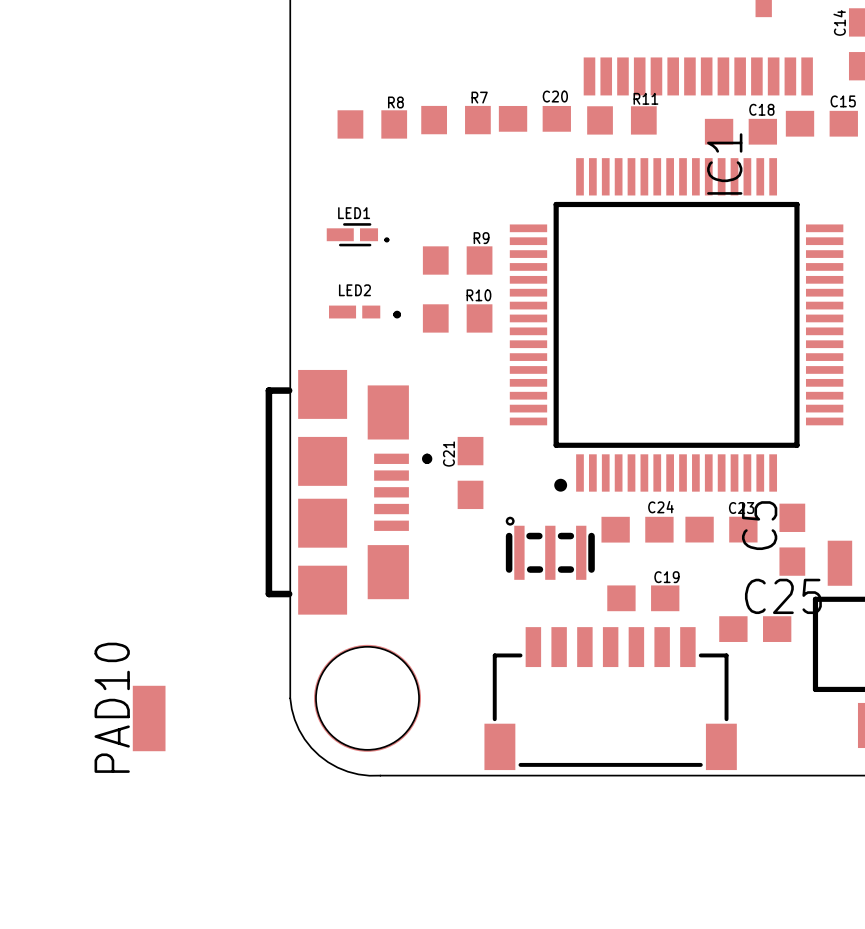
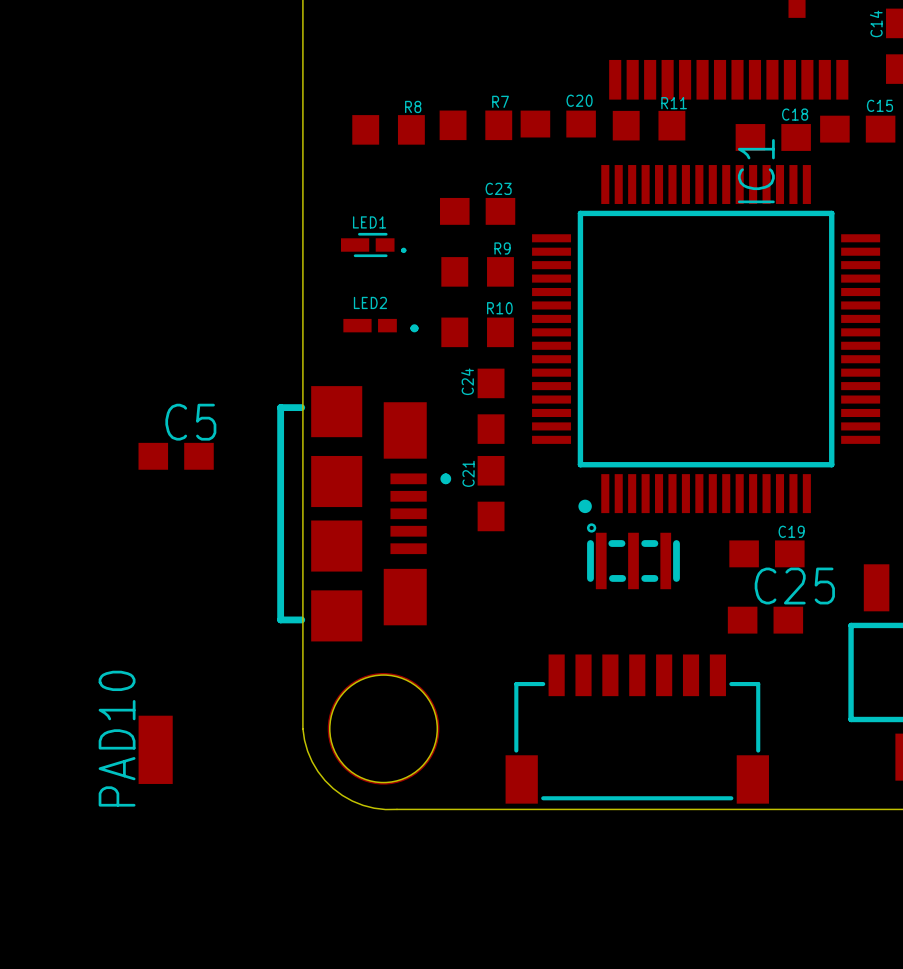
C24 rotation: 0° (637, 529) -> 90° clockwise (491, 406)
C24 position: (637, 529) -> (491, 406)
C23 position: (721, 529) -> (477, 211)
C5 rotation: 0° (792, 539) -> 90° clockwise (176, 456)
C5 position: (792, 539) -> (176, 456)
part position: (550, 548) -> (633, 556)
C19 position: (643, 598) -> (766, 553)
C25 position: (755, 629) -> (765, 620)

